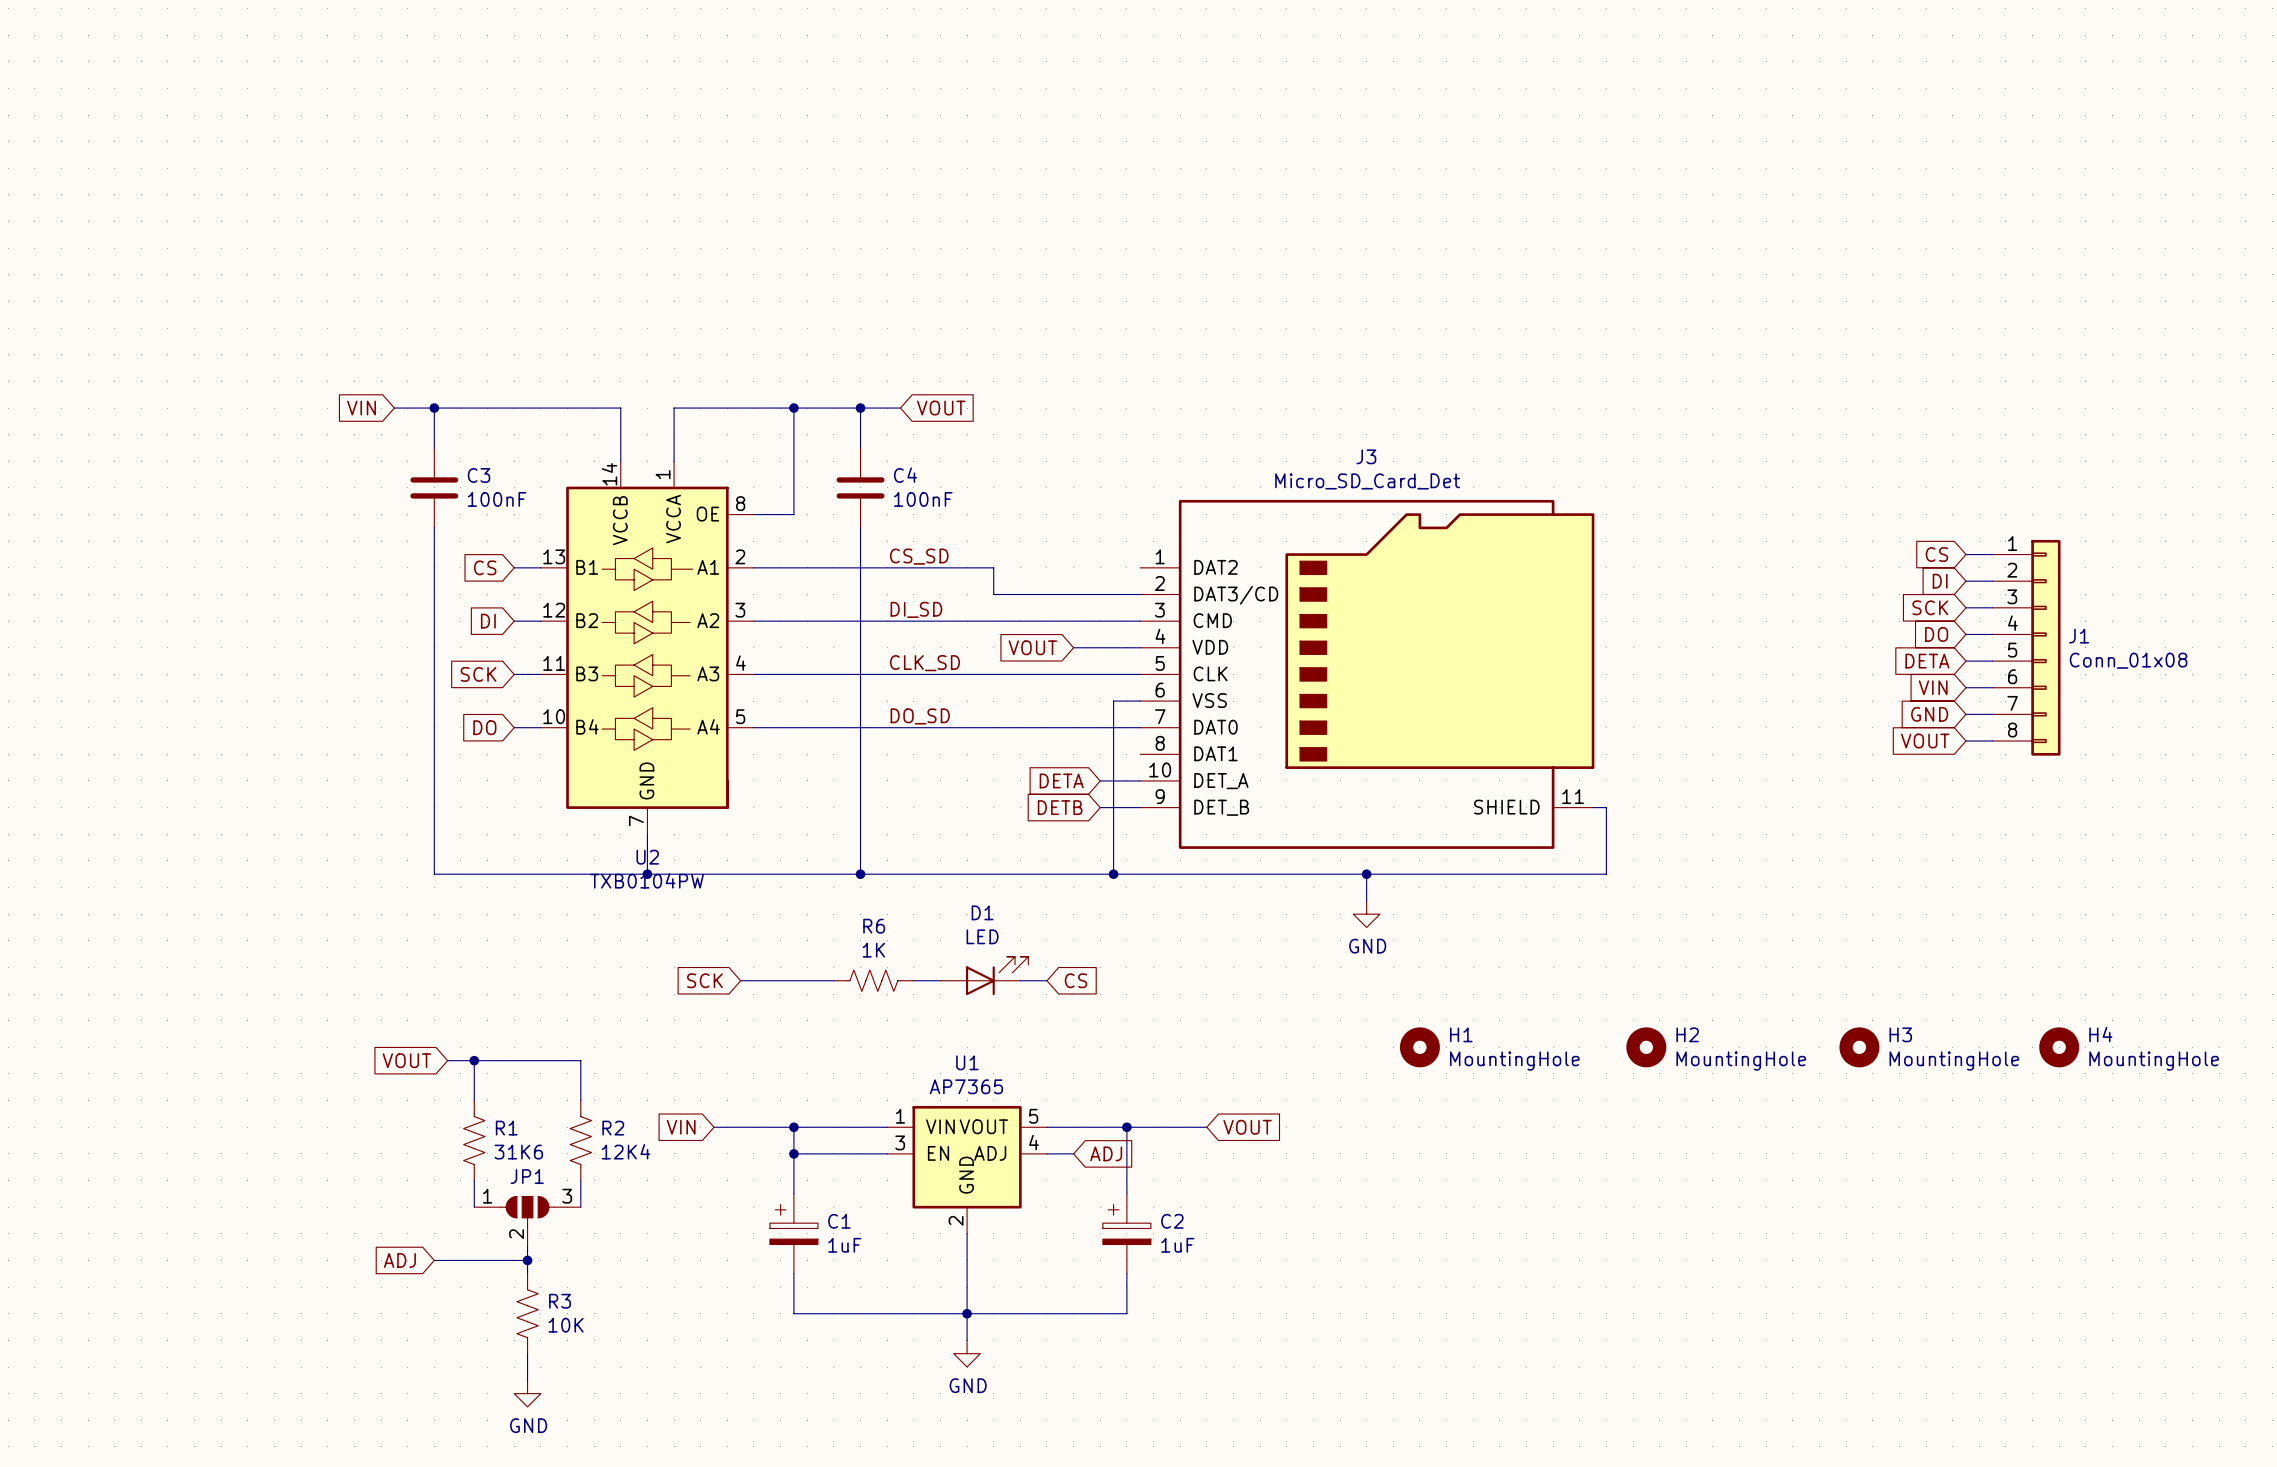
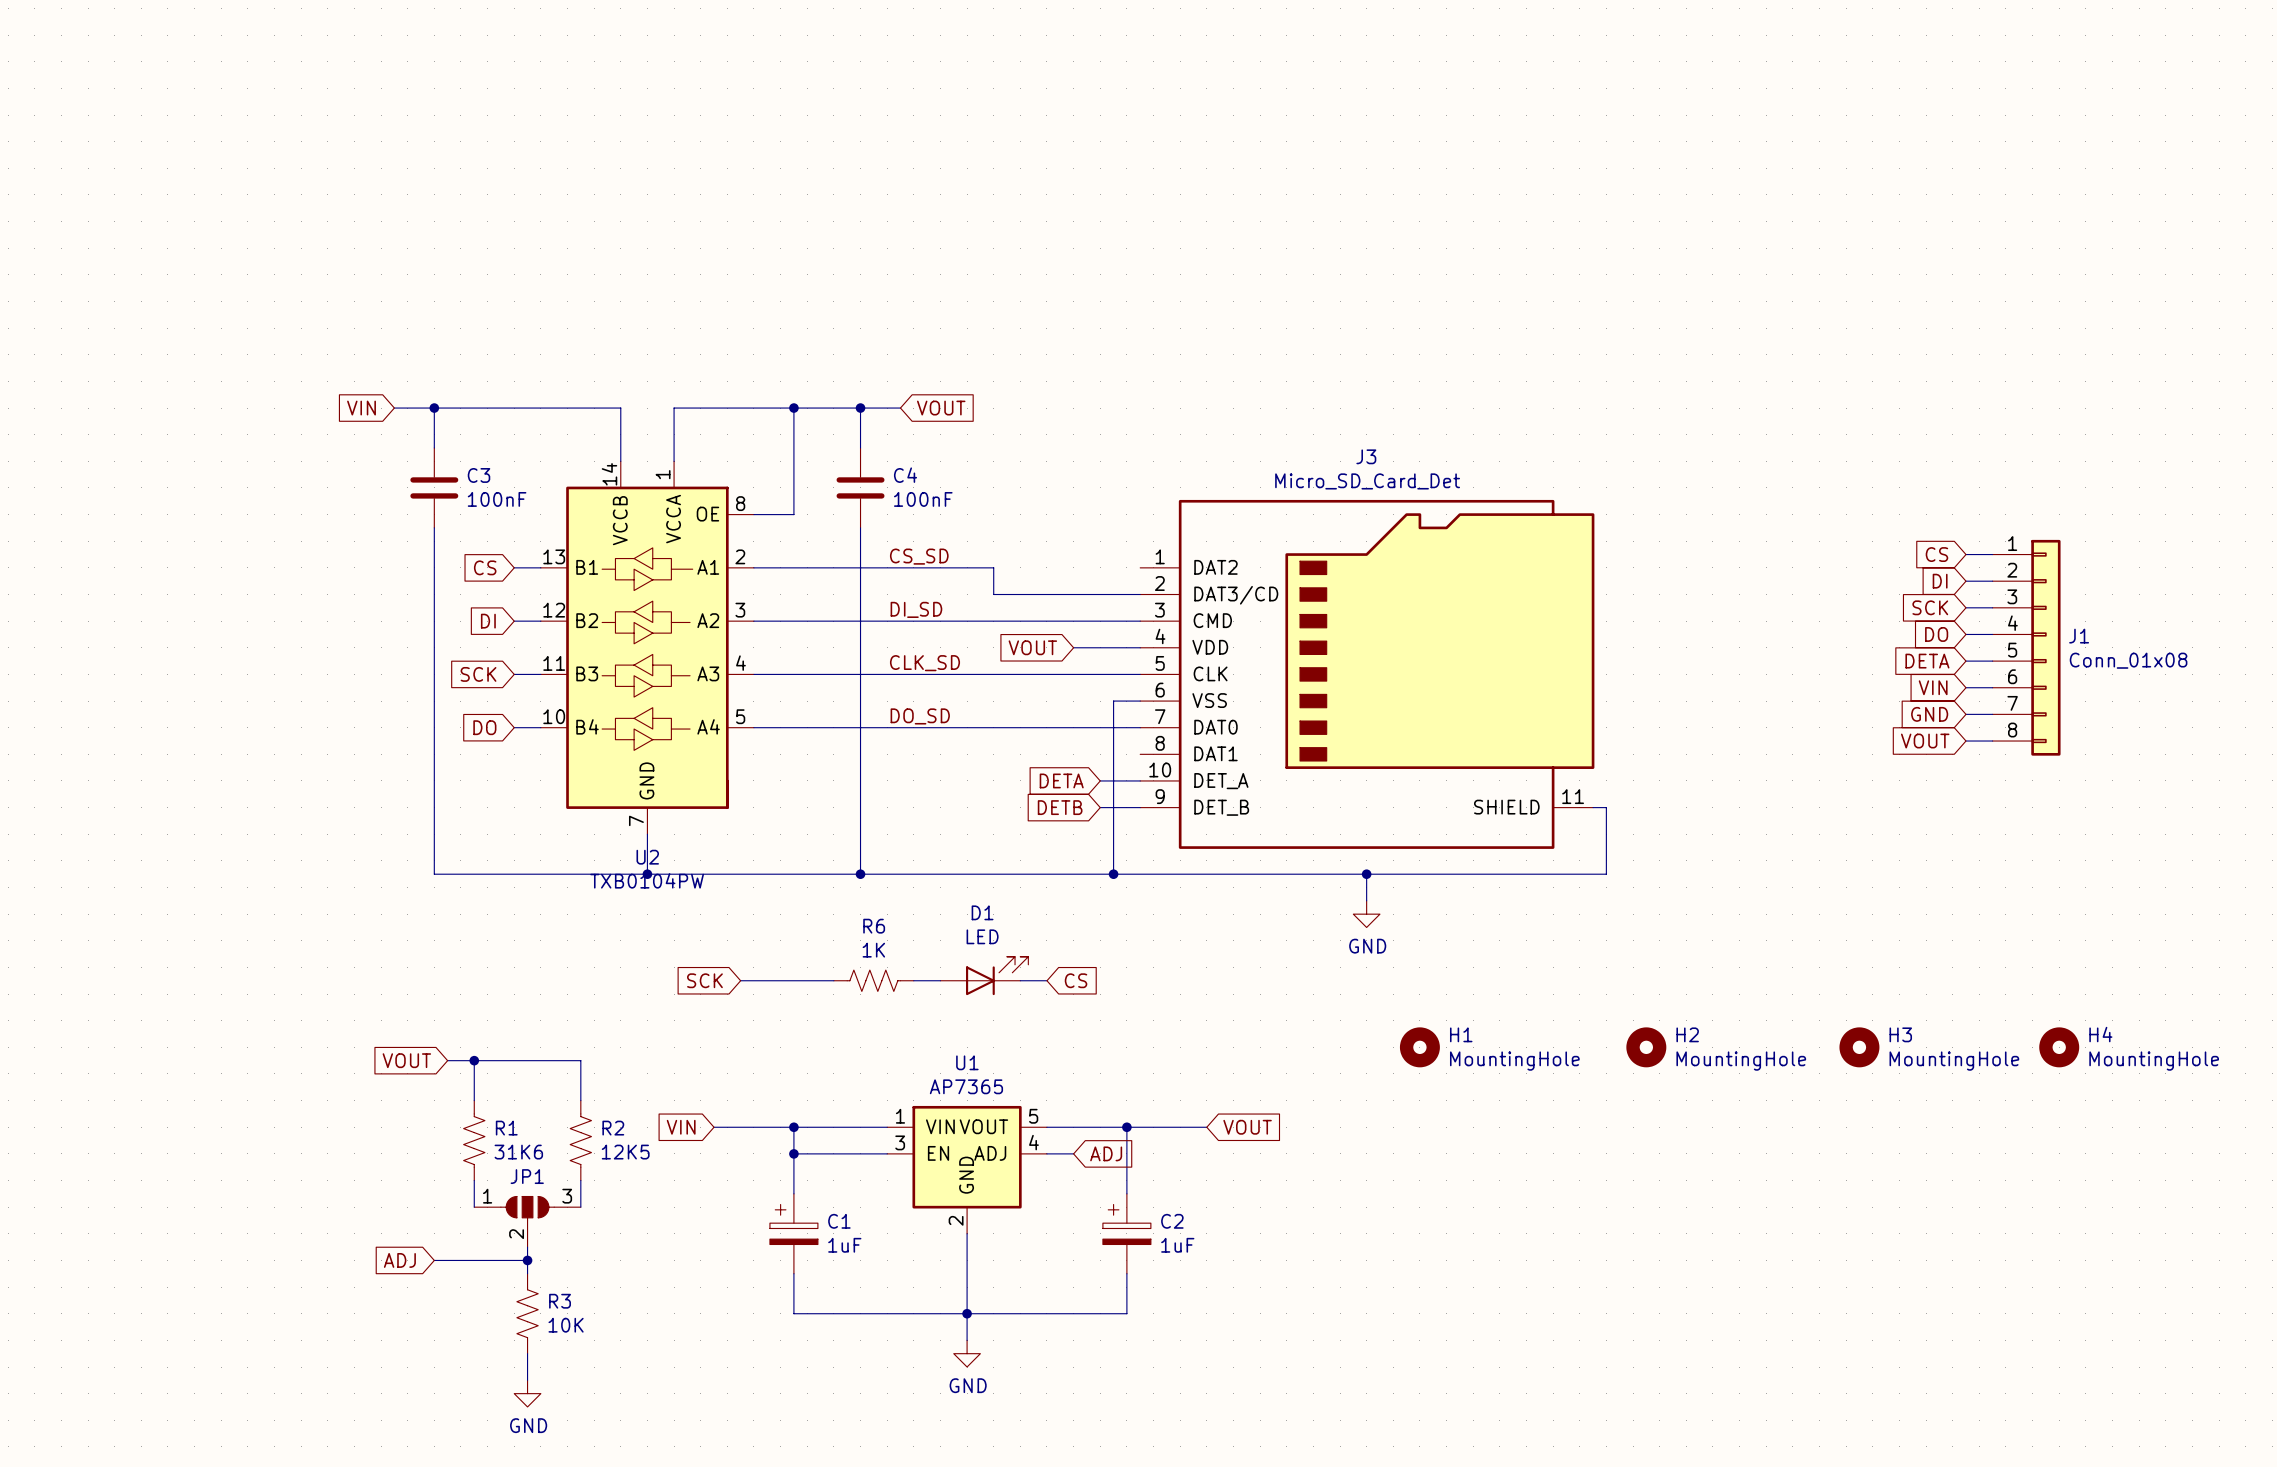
R2 value: 12K4 (625, 1151) -> 12K5 (625, 1152)

